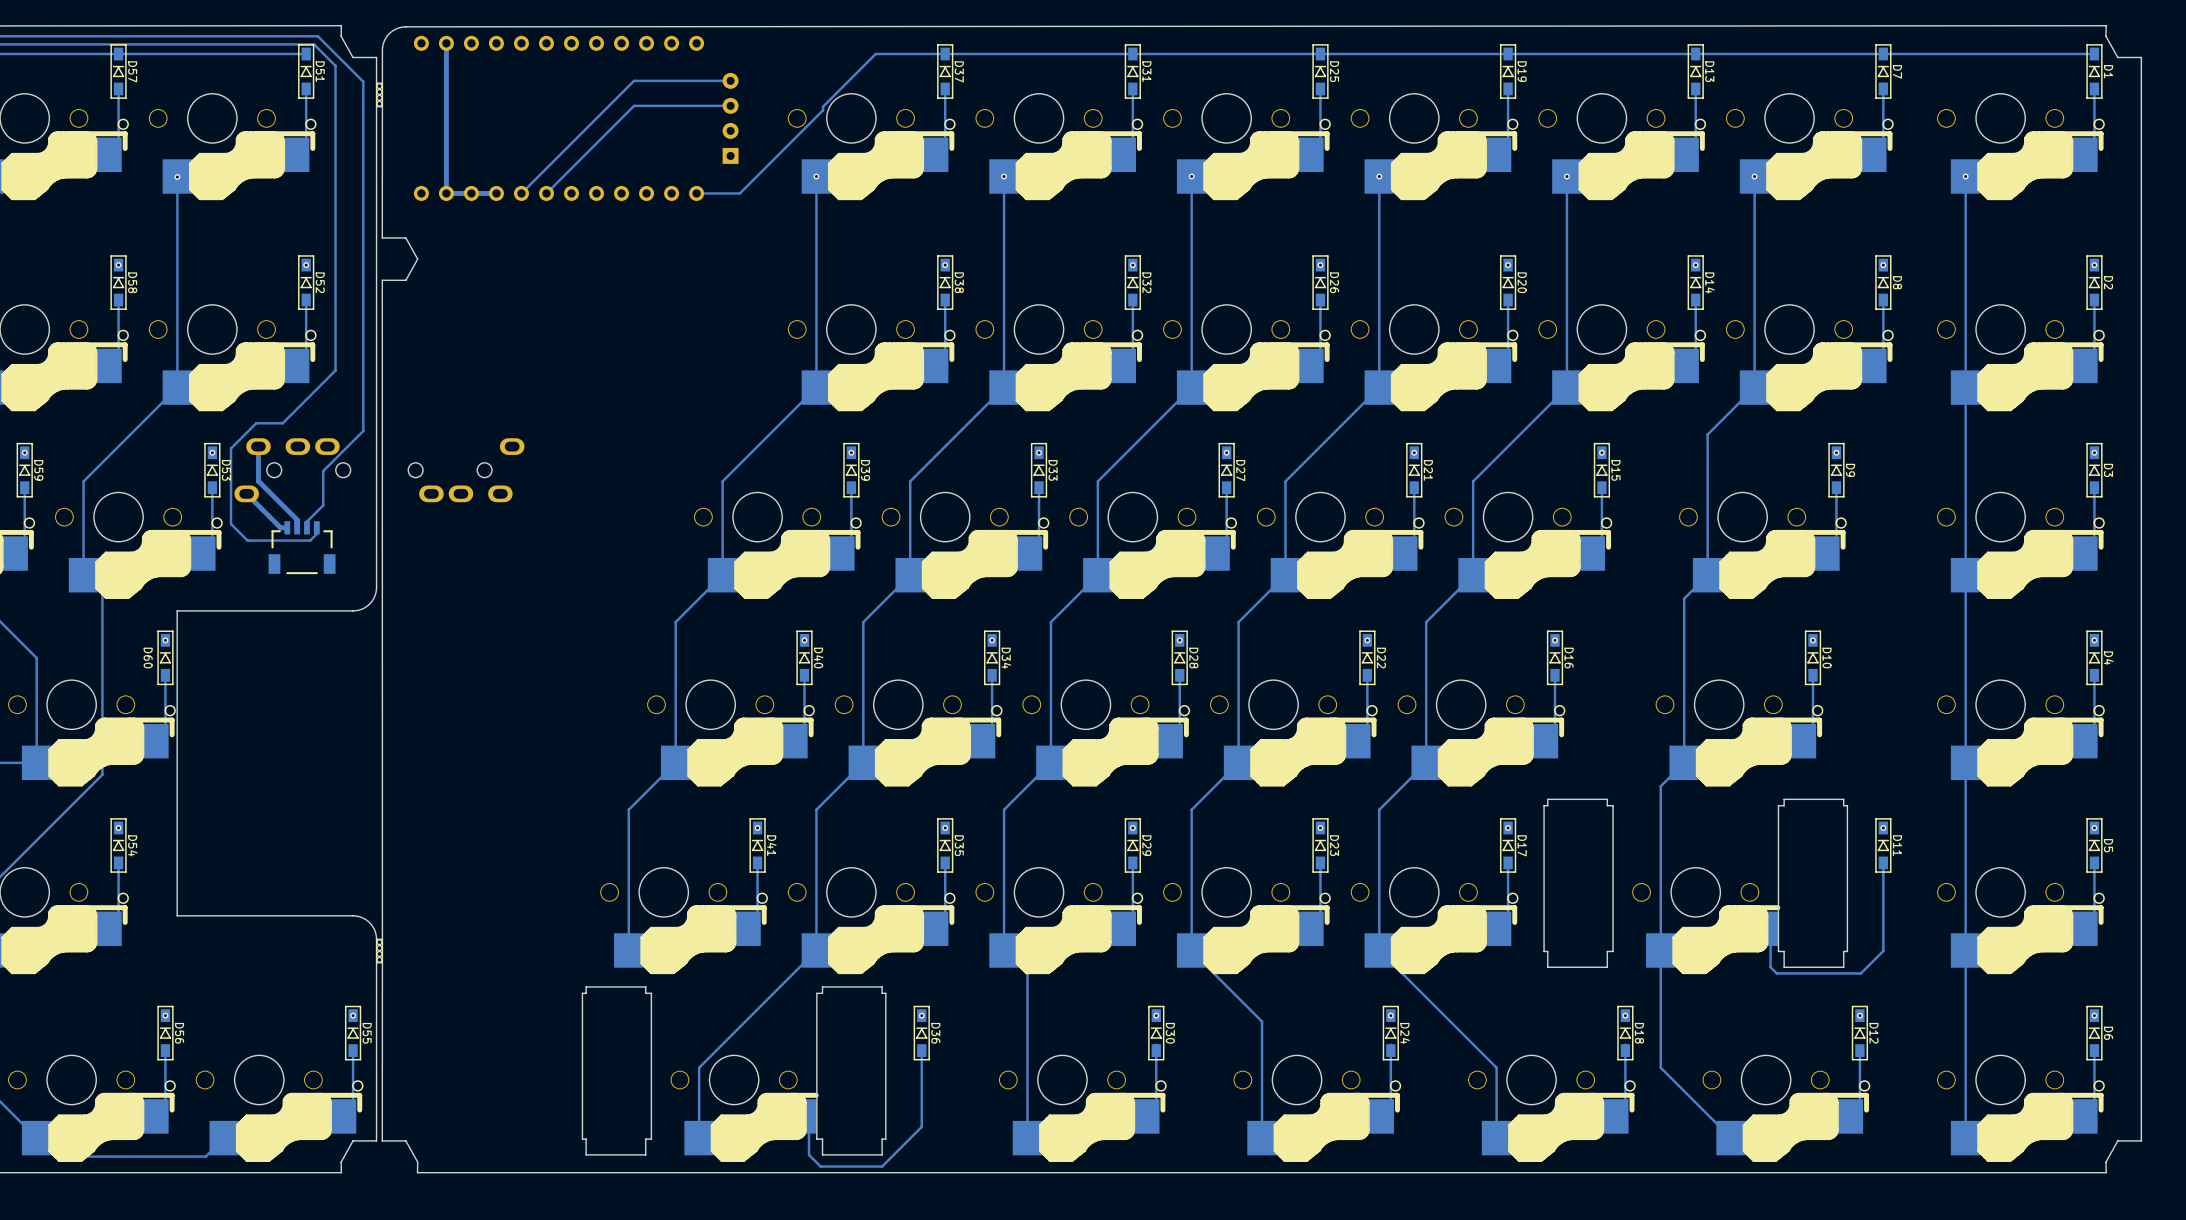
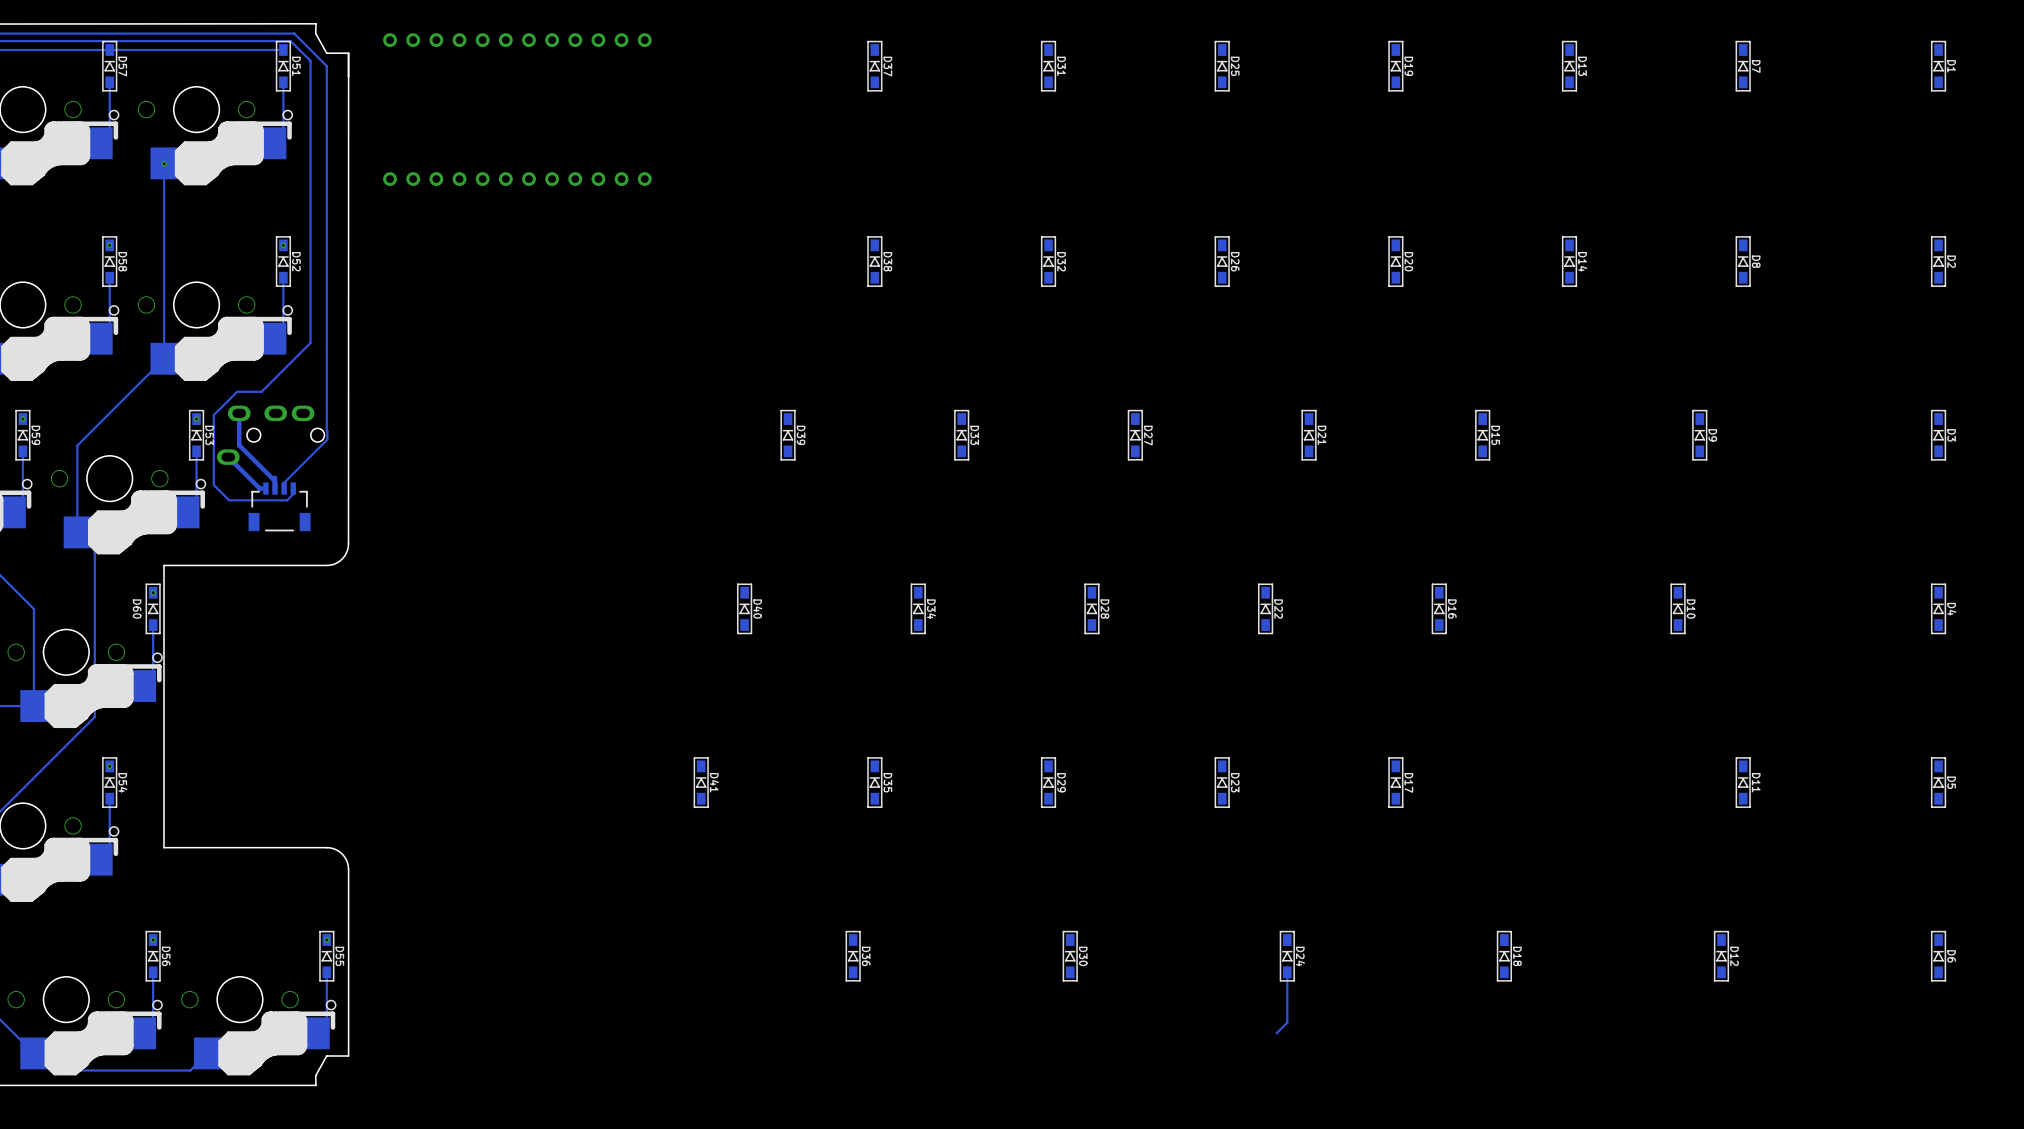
track: (446, 43) (446, 193) (496, 193) -> none
track: (2094, 54) (875, 54) (823, 106) (823, 110) (739, 193) (696, 193) -> none
track: (353, 71) (363, 81) (363, 431) (323, 471) (323, 505) -> (326, 66) (327, 439) (299, 467)
track: (730, 80) (634, 80) (521, 193) -> none
board edge: (382, 83) (382, 50) (384, 40) (393, 30) (405, 26) (2106, 25) (2105, 36) (2117, 57) (2141, 57) (2141, 1140) (2117, 1140) (2105, 1162) (2106, 1172) (417, 1172) (417, 1162) (405, 1140) (382, 1140) (382, 962) -> none
track: (945, 88) (945, 143) (933, 154) -> none
track: (1132, 88) (1132, 143) (1121, 154) -> none
track: (1320, 88) (1320, 143) (1308, 154) -> none
track: (1508, 88) (1508, 143) (1496, 154) -> none
track: (1695, 88) (1695, 143) (1684, 154) -> none
track: (1883, 88) (1883, 143) (1871, 154) -> none
track: (2094, 88) (2094, 143) (2082, 154) -> none
part: (379, 94) -> none
track: (730, 105) (634, 105) (546, 193) -> none
board edge: (376, 106) (376, 587) (374, 596) (367, 606) (356, 610) (177, 610) -> (348, 53) (348, 543) (346, 552) (340, 560) (329, 565) (163, 565)
board edge: (382, 106) (382, 237) (405, 237) (417, 259) (405, 280) (382, 280) (382, 939) -> none
part: (730, 118) -> none
part: (871, 146) -> none
part: (1059, 146) -> none
part: (1246, 146) -> none
part: (1434, 146) -> none
part: (1622, 146) -> none
part: (1809, 146) -> none
part: (2020, 146) -> none
track: (816, 176) (816, 387) (722, 481) (722, 575) (675, 622) (675, 762) (628, 809) (628, 950) -> none
via: (816, 176) -> none
track: (1004, 176) (1004, 387) (910, 481) (910, 575) (863, 622) (863, 762) (816, 809) (816, 950) (699, 1067) (699, 1138) -> none
via: (1004, 176) -> none
track: (1191, 176) (1191, 387) (1097, 481) (1097, 575) (1050, 622) (1050, 762) (1004, 809) (1004, 950) (1027, 973) (1027, 1138) -> none
via: (1191, 176) -> none
track: (1379, 176) (1379, 387) (1285, 481) (1285, 575) (1238, 622) (1238, 762) (1191, 809) (1191, 951) (1262, 1021) (1262, 1138) -> none
via: (1379, 176) -> none
track: (1566, 176) (1566, 387) (1473, 481) (1473, 575) (1426, 622) (1426, 762) (1379, 809) (1379, 950) (1496, 1067) (1496, 1138) -> none
via: (1566, 176) -> none
track: (1754, 176) (1754, 387) (1707, 434) (1707, 575) (1684, 598) (1684, 762) (1660, 786) (1660, 1067) (1731, 1138) -> none
via: (1754, 176) -> none
track: (1965, 176) (1965, 1138) -> none
via: (1965, 176) -> none
via: (945, 265) -> none
via: (1132, 265) -> none
via: (1320, 265) -> none
via: (1508, 265) -> none
via: (1695, 265) -> none
via: (1883, 265) -> none
via: (2094, 265) -> none
track: (945, 300) (945, 354) (933, 365) -> none
track: (1132, 300) (1132, 354) (1121, 365) -> none
track: (1320, 300) (1320, 354) (1308, 365) -> none
track: (1508, 300) (1508, 354) (1496, 365) -> none
track: (1695, 300) (1695, 354) (1684, 365) -> none
track: (1883, 300) (1883, 354) (1871, 365) -> none
track: (2094, 300) (2094, 354) (2082, 365) -> none
part: (871, 358) -> none
part: (1059, 358) -> none
part: (1246, 358) -> none
part: (1434, 358) -> none
part: (1622, 358) -> none
part: (1809, 358) -> none
part: (2020, 358) -> none
via: (851, 452) -> none
via: (1039, 452) -> none
via: (1226, 452) -> none
via: (1414, 452) -> none
via: (1601, 452) -> none
via: (1836, 452) -> none
via: (2094, 452) -> none
part: (466, 470) -> none
track: (851, 487) (851, 541) (839, 553) -> none
track: (1039, 487) (1039, 541) (1027, 553) -> none
track: (1226, 487) (1226, 541) (1215, 553) -> none
track: (1414, 487) (1414, 541) (1402, 553) -> none
track: (1601, 487) (1601, 541) (1590, 553) -> none
track: (1836, 487) (1836, 541) (1824, 553) -> none
track: (2094, 487) (2094, 541) (2082, 553) -> none
part: (777, 545) -> none
part: (965, 545) -> none
part: (1153, 545) -> none
part: (1340, 545) -> none
part: (1528, 545) -> none
part: (1762, 545) -> none
part: (2020, 545) -> none
via: (804, 640) -> none
via: (992, 640) -> none
via: (1179, 640) -> none
via: (1367, 640) -> none
via: (1555, 640) -> none
via: (1812, 640) -> none
via: (2094, 640) -> none
track: (804, 675) (804, 729) (792, 741) -> none
track: (992, 675) (992, 729) (980, 741) -> none
track: (1179, 675) (1179, 729) (1168, 741) -> none
track: (1367, 675) (1367, 729) (1355, 741) -> none
track: (1555, 675) (1555, 729) (1543, 741) -> none
track: (1812, 675) (1812, 729) (1801, 741) -> none
track: (2094, 675) (2094, 729) (2082, 741) -> none
part: (730, 733) -> none
part: (918, 733) -> none
part: (1106, 733) -> none
part: (1293, 733) -> none
part: (1481, 733) -> none
part: (1739, 733) -> none
part: (2020, 733) -> none
via: (757, 827) -> none
via: (945, 827) -> none
via: (1132, 827) -> none
via: (1320, 827) -> none
via: (1508, 827) -> none
via: (1883, 827) -> none
via: (2094, 827) -> none
track: (757, 862) (757, 917) (746, 928) -> none
track: (945, 862) (945, 917) (933, 928) -> none
track: (1132, 862) (1132, 917) (1121, 928) -> none
track: (1320, 862) (1320, 917) (1308, 928) -> none
track: (1508, 862) (1508, 917) (1496, 928) -> none
track: (1883, 862) (1883, 951) (1860, 973) (1776, 973) (1770, 967) (1770, 928) -> none
track: (2094, 862) (2094, 917) (2082, 928) -> none
part: (1695, 886) -> none
part: (684, 920) -> none
part: (871, 920) -> none
part: (1059, 920) -> none
part: (1246, 920) -> none
part: (1434, 920) -> none
part: (2020, 920) -> none
part: (379, 951) -> none
board edge: (376, 962) (376, 1140) -> (348, 869) (348, 1056)
via: (921, 1015) -> none
via: (1156, 1015) -> none
via: (1390, 1015) -> none
via: (1625, 1015) -> none
via: (1859, 1015) -> none
via: (2094, 1015) -> none
track: (1156, 1044) (1156, 1104) (1144, 1116) -> none
track: (1625, 1044) (1625, 1104) (1613, 1116) -> none
track: (921, 1050) (921, 1126) (882, 1166) (820, 1166) (808, 1154) (808, 1116) -> none
track: (1859, 1050) (1859, 1104) (1848, 1116) -> none
track: (2094, 1050) (2094, 1104) (2082, 1116) -> none
part: (734, 1074) -> none
part: (1082, 1108) -> none
part: (1317, 1108) -> none
part: (1551, 1108) -> none
part: (1786, 1108) -> none
part: (2020, 1108) -> none

